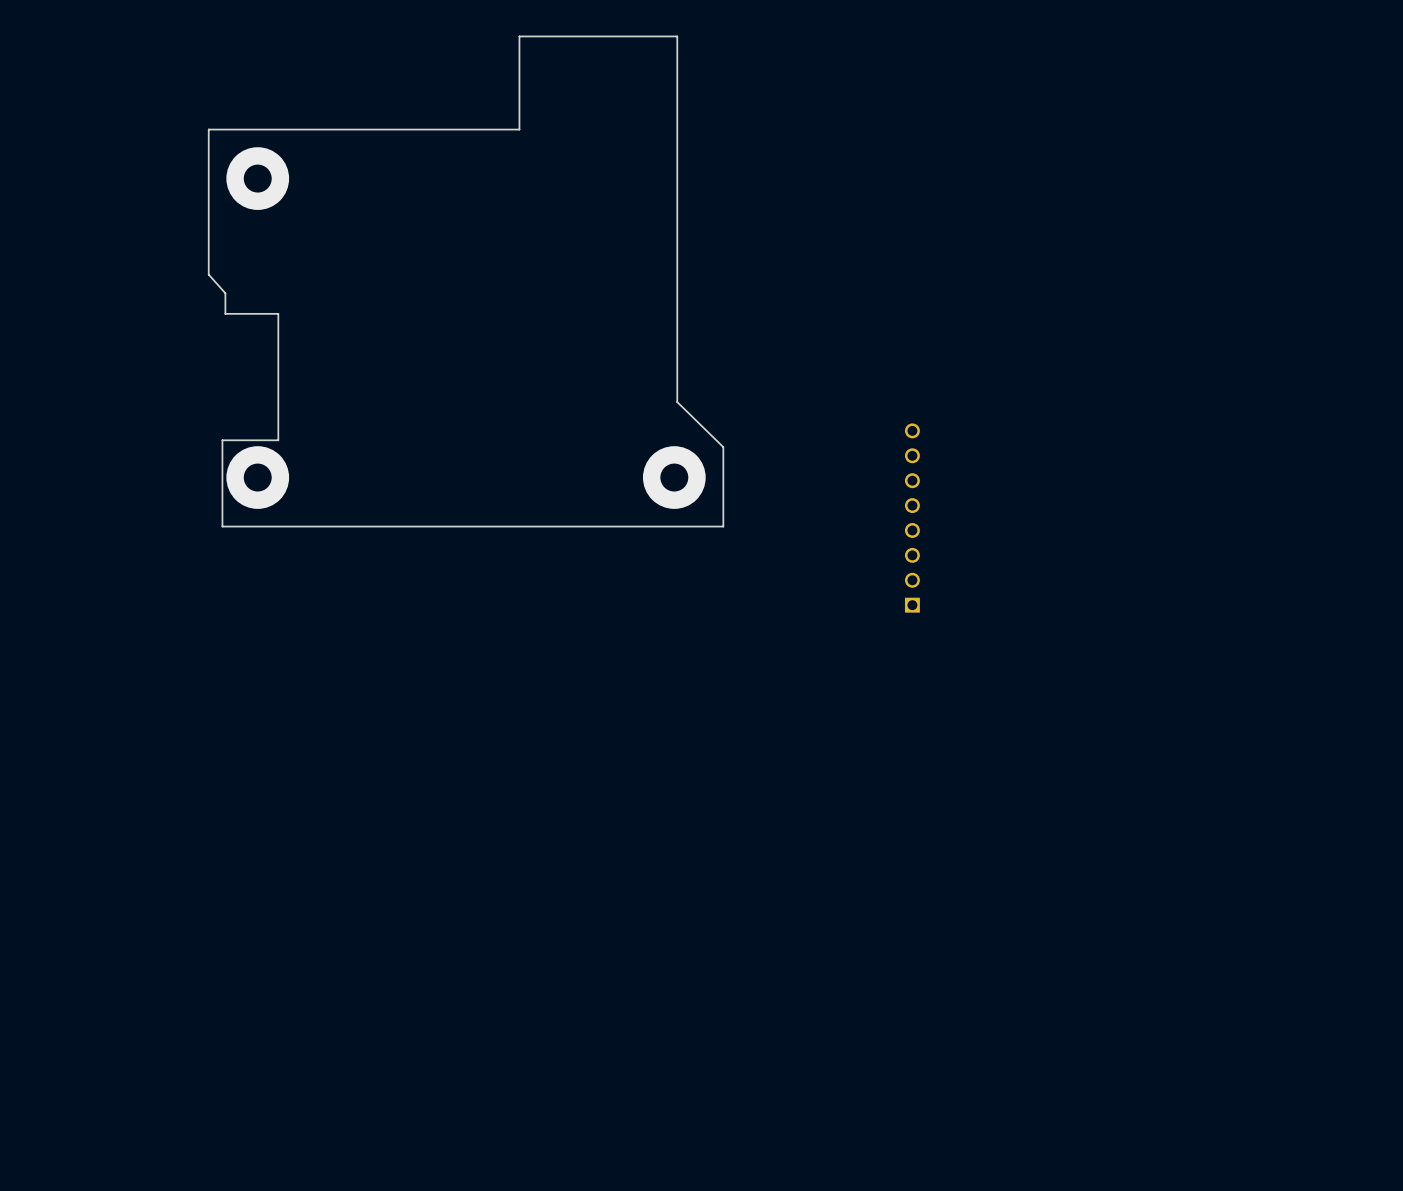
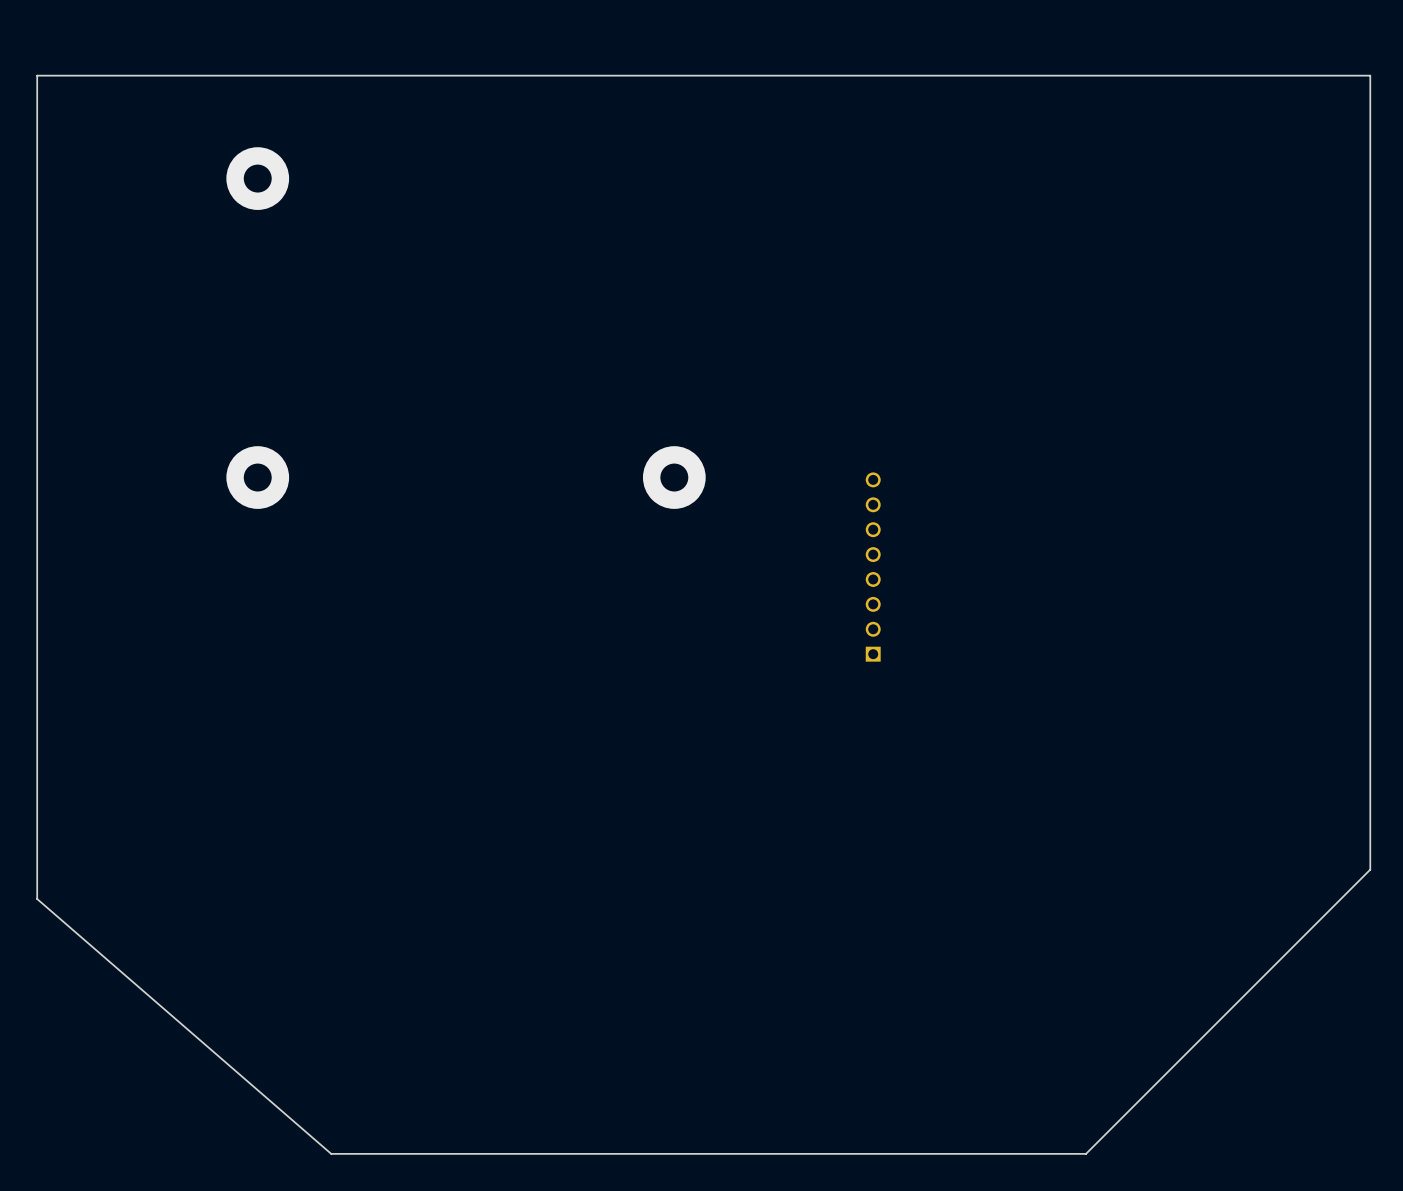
board edge: (677, 36) (677, 402) (723, 447) (723, 526) (222, 526) (222, 440) (278, 440) (278, 313) (225, 313) (225, 293) (208, 274) (208, 129) (519, 129) (519, 36) (677, 36) -> none
board edge: none -> (1370, 75) (1370, 869) (1086, 1153) (331, 1153) (37, 899) (37, 75) (1370, 75)
part position: (912, 518) -> (873, 567)

